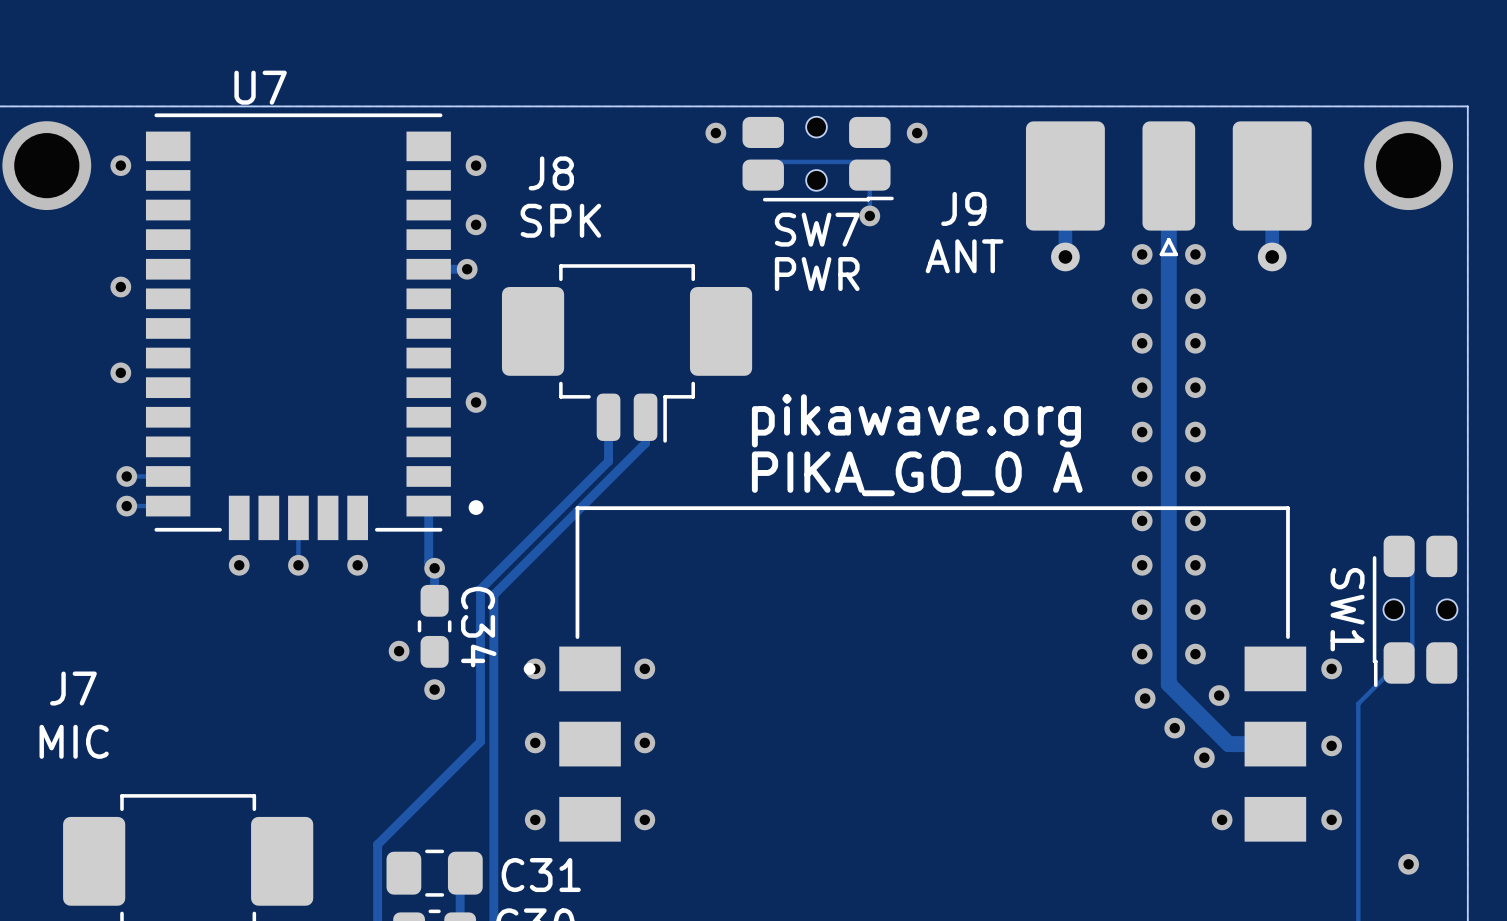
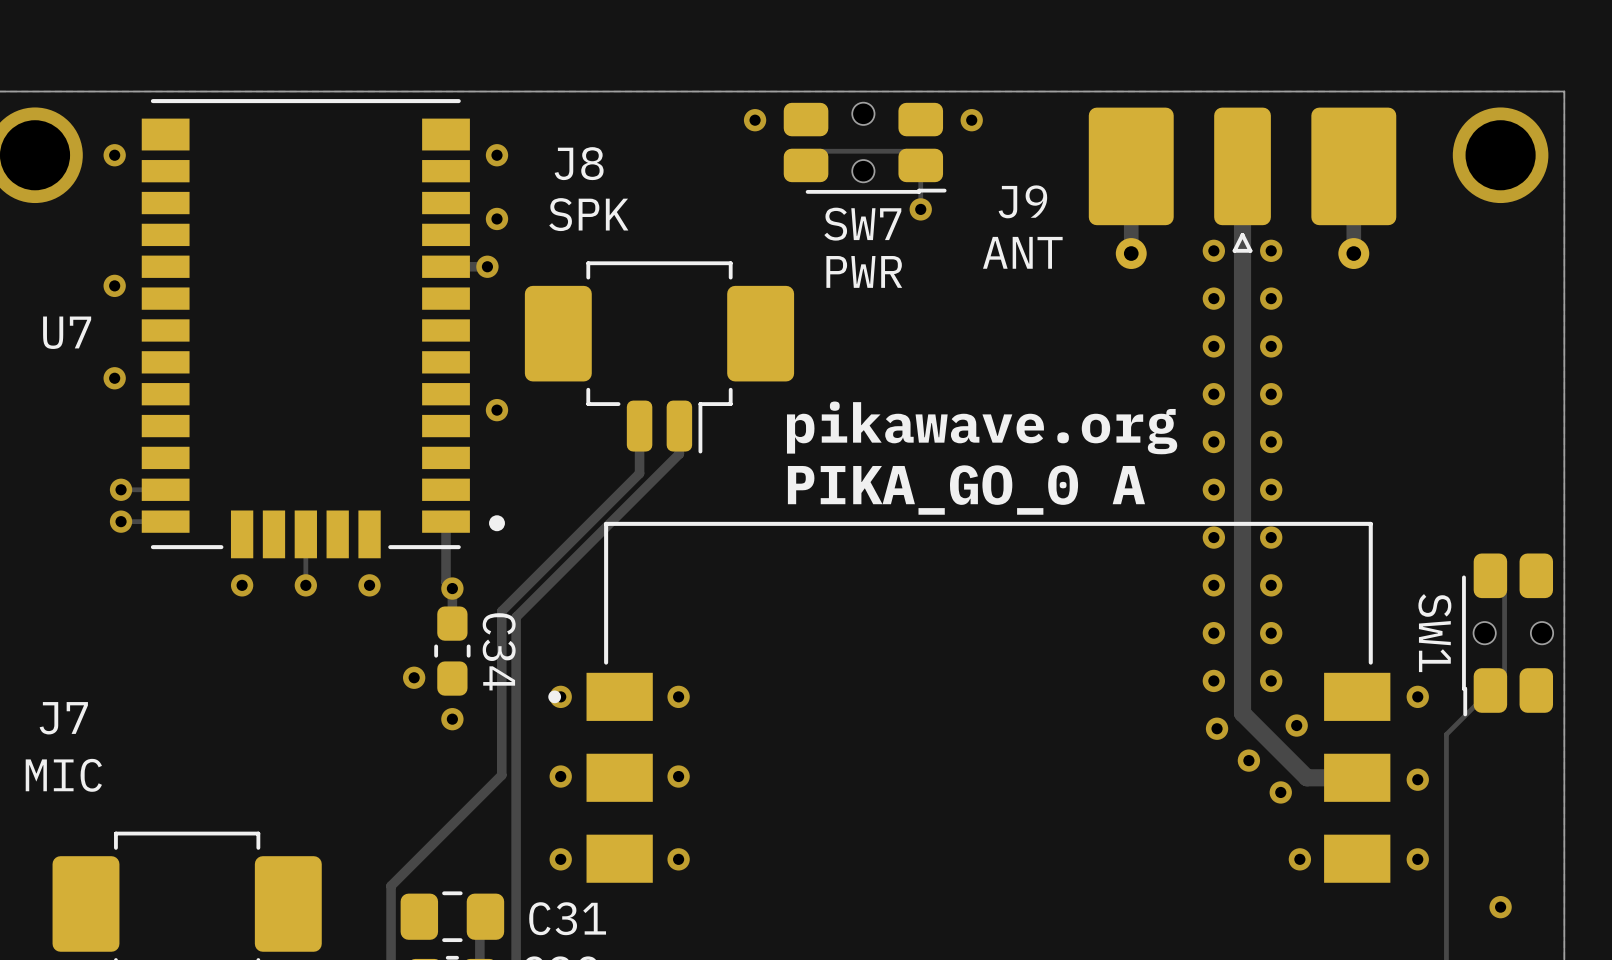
U7 name position: U7 (260, 87) -> U7 (67, 332)

